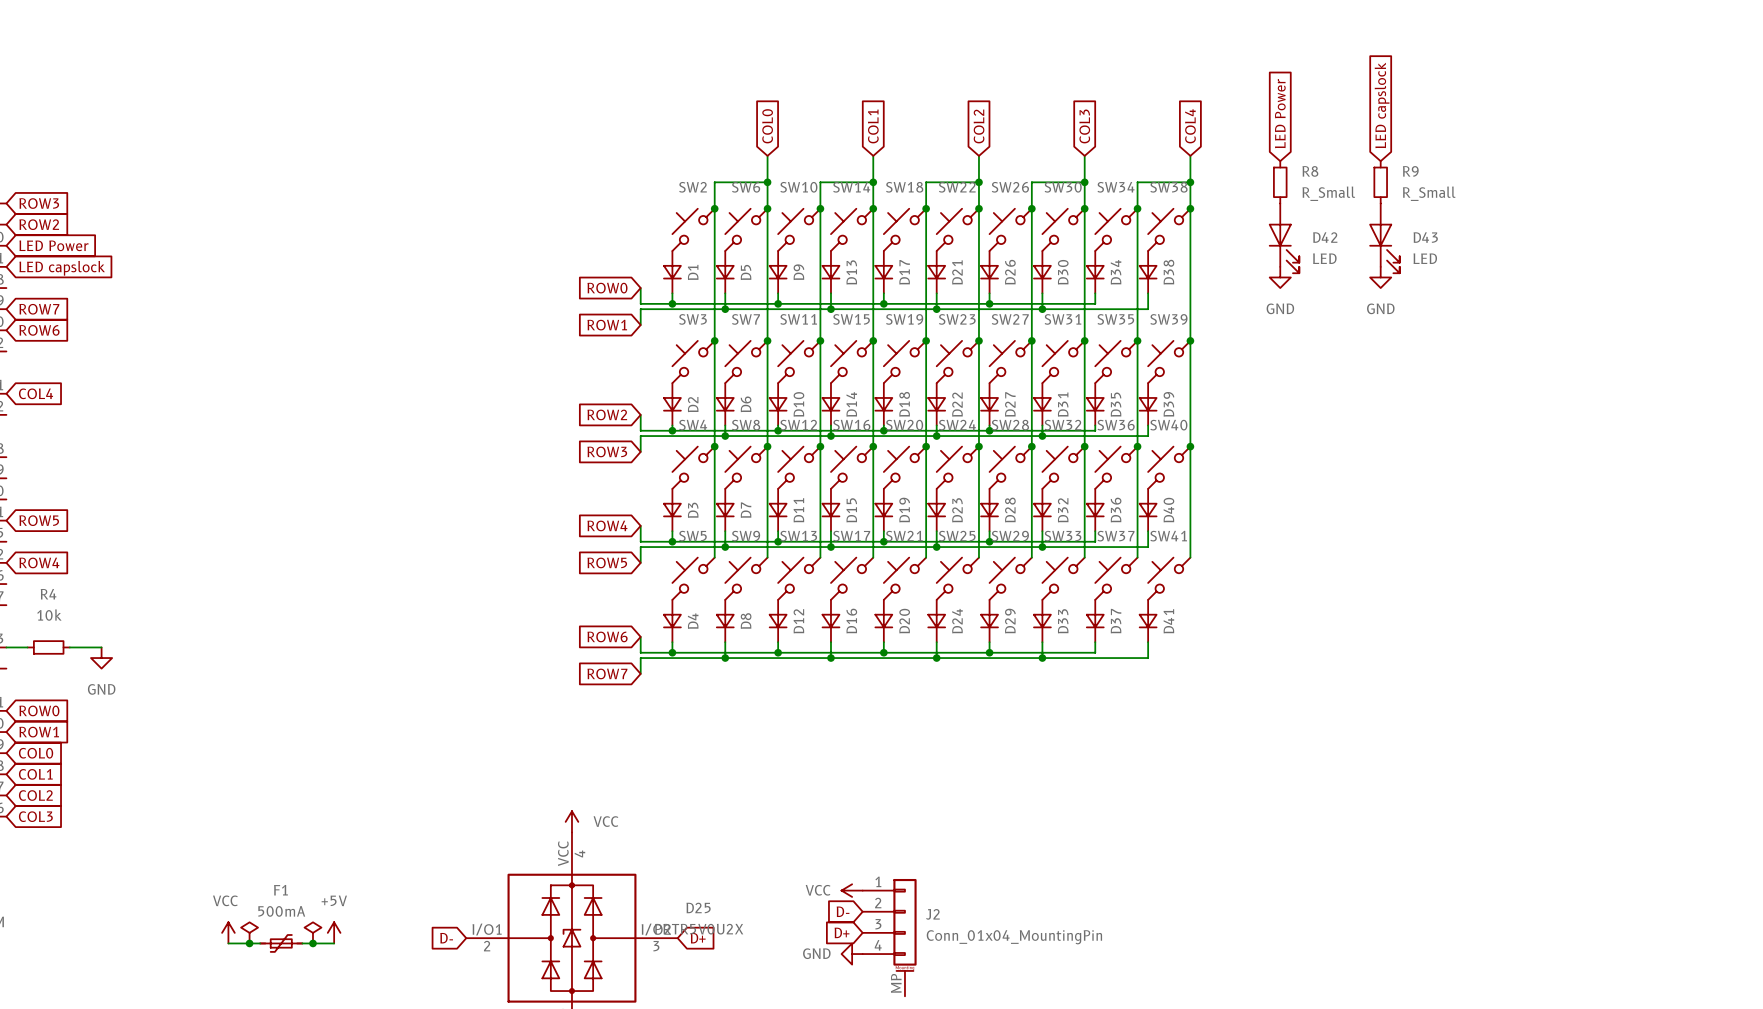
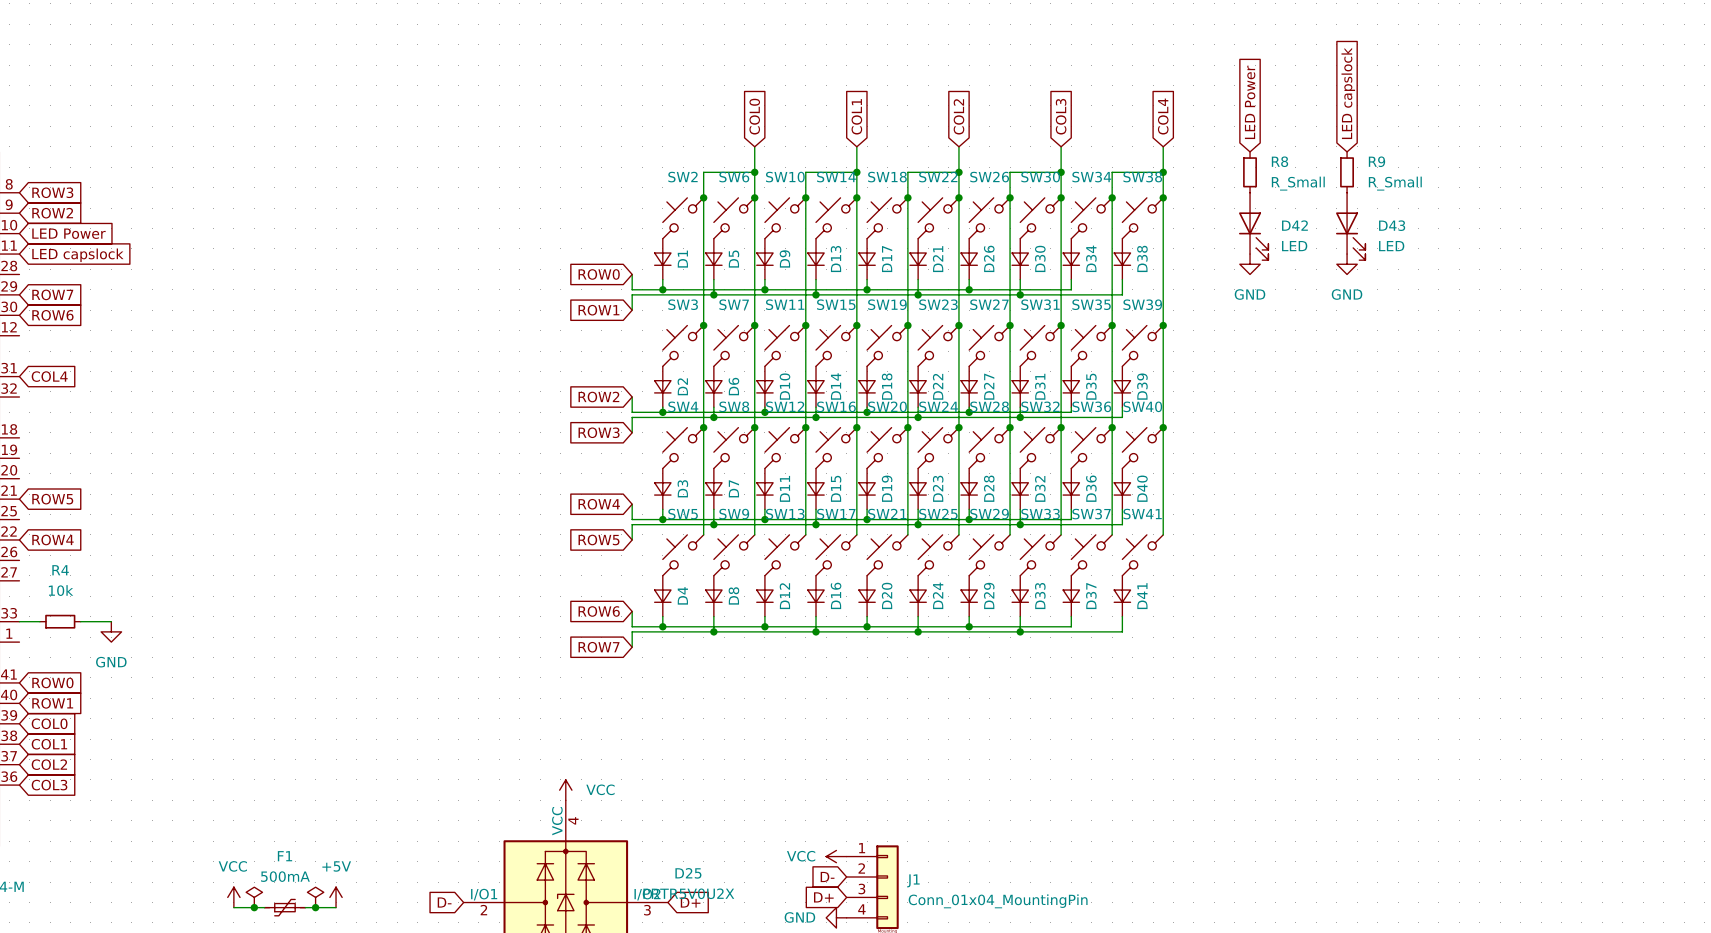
J2 name: J2 (932, 914) -> J1 (913, 880)

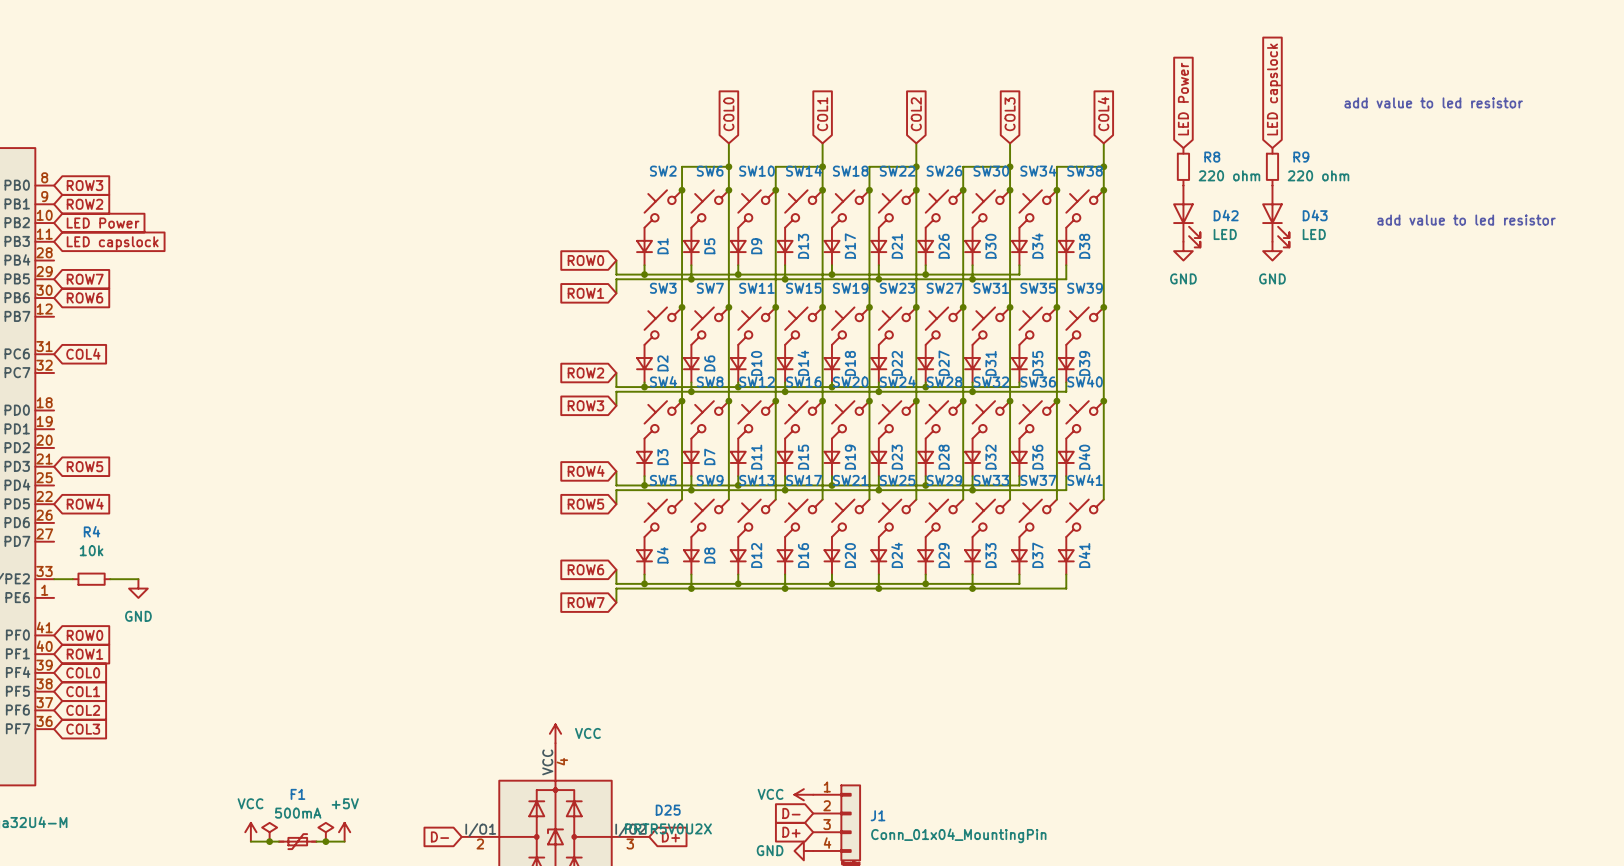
text: none -> add value to led resistor (1433, 102)
R8 value: R_Small (1298, 183) -> 220 ohm (1229, 175)
R9 value: R_Small (1395, 183) -> 220 ohm (1318, 175)
text: none -> add value to led resistor (1466, 220)

